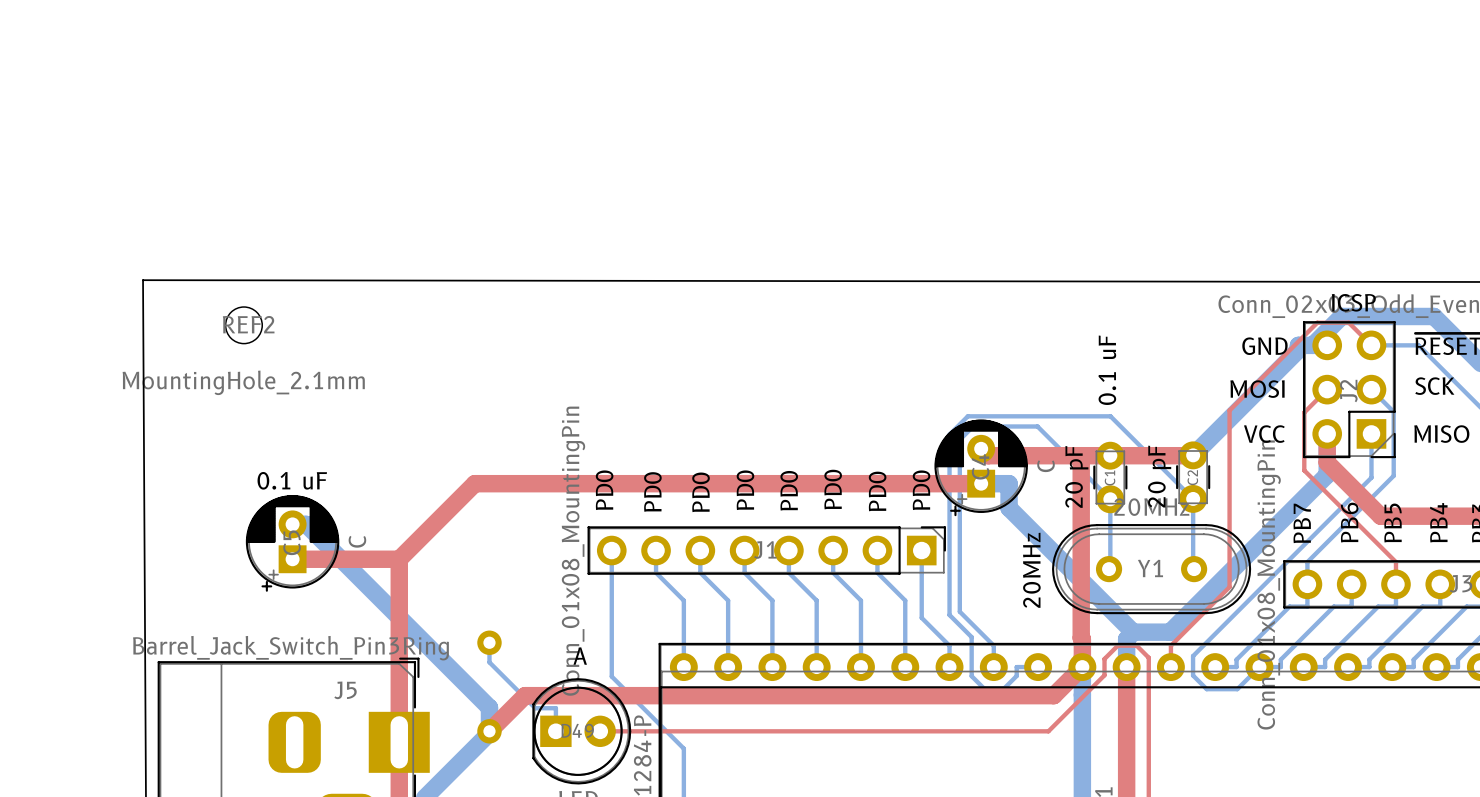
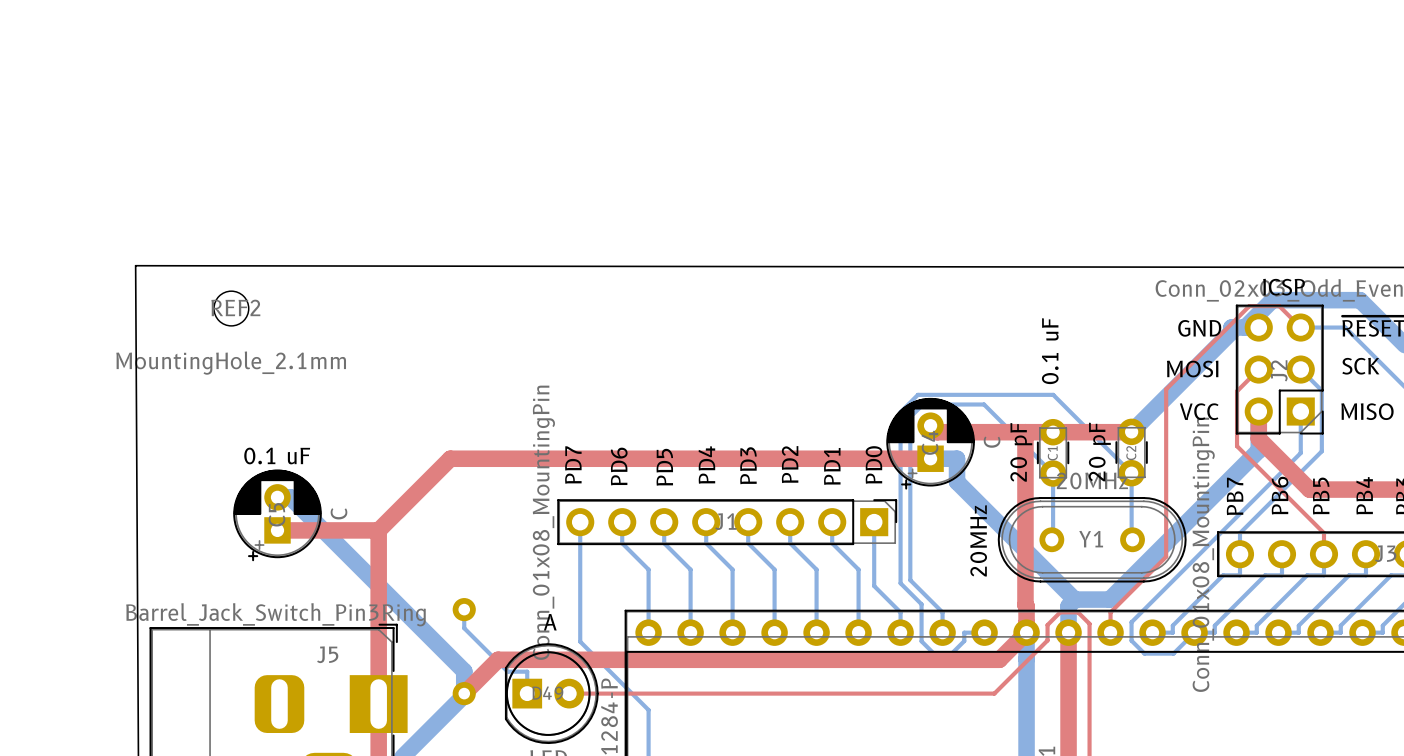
text: PD0 (833, 489) -> PD2 (790, 464)
text: PD0 (604, 490) -> PD7 (573, 465)
text: PD0 (745, 490) -> PD4 (706, 465)
text: PD0 (789, 490) -> PD3 (748, 465)
text: PD0 (652, 491) -> PD6 (619, 466)
text: PD0 (877, 491) -> PD1 (832, 466)
text: PD0 (701, 492) -> PD5 (664, 467)

